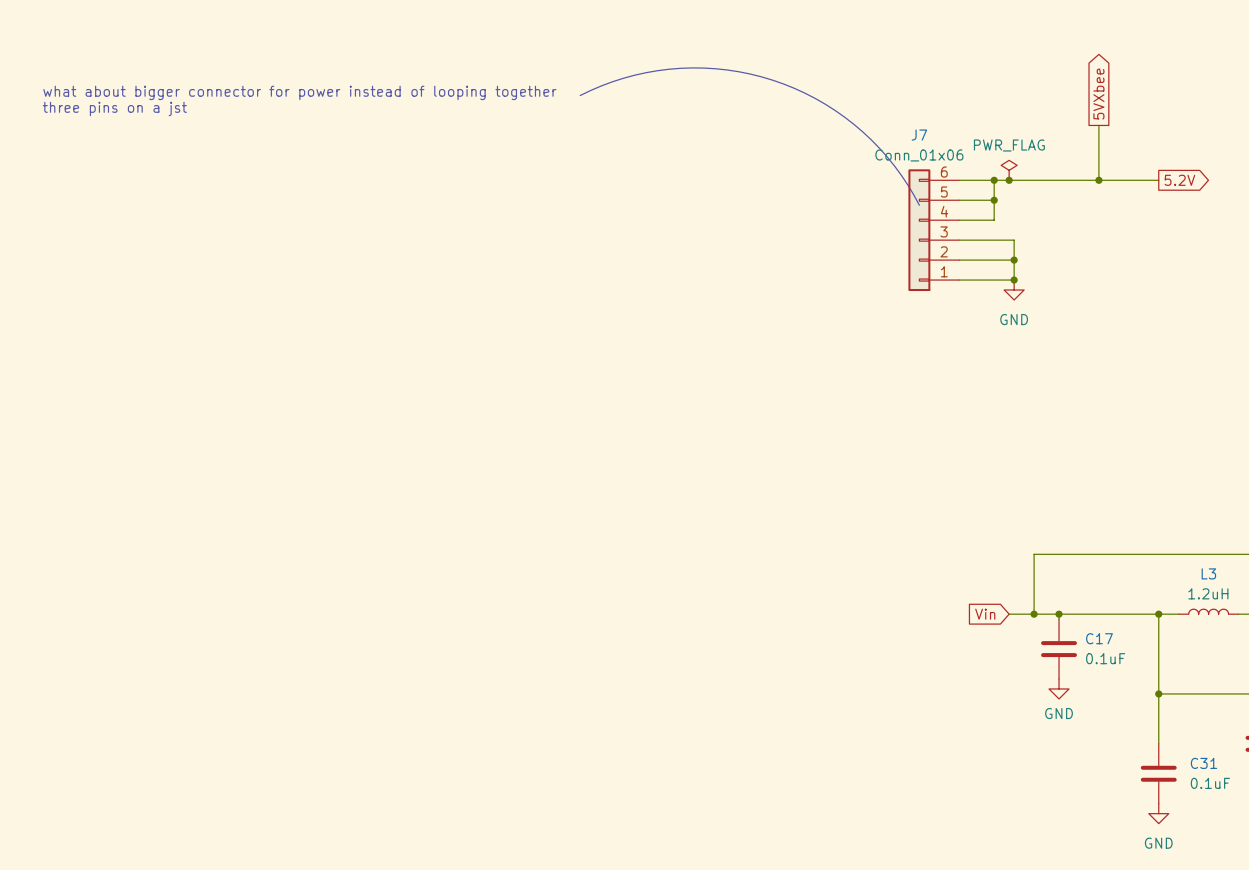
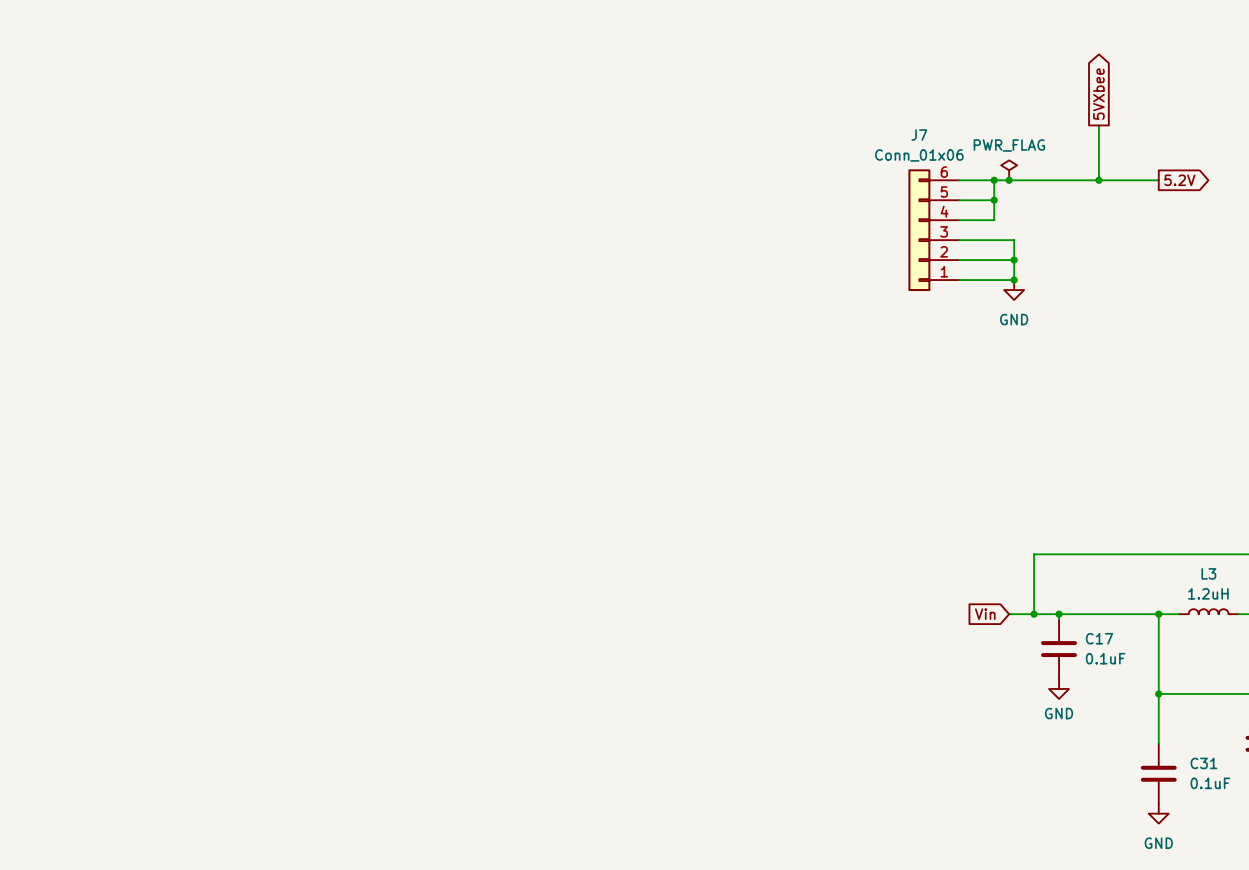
text: what about bigger connector for power instead of looping together (299, 92) -> none
line: (580, 95) (623, 78) (669, 69) (692, 67) (727, 69) (772, 80) (815, 98) (844, 117) (862, 131) (894, 165) (919, 205) -> none
text: three pins on a jst (114, 108) -> none

